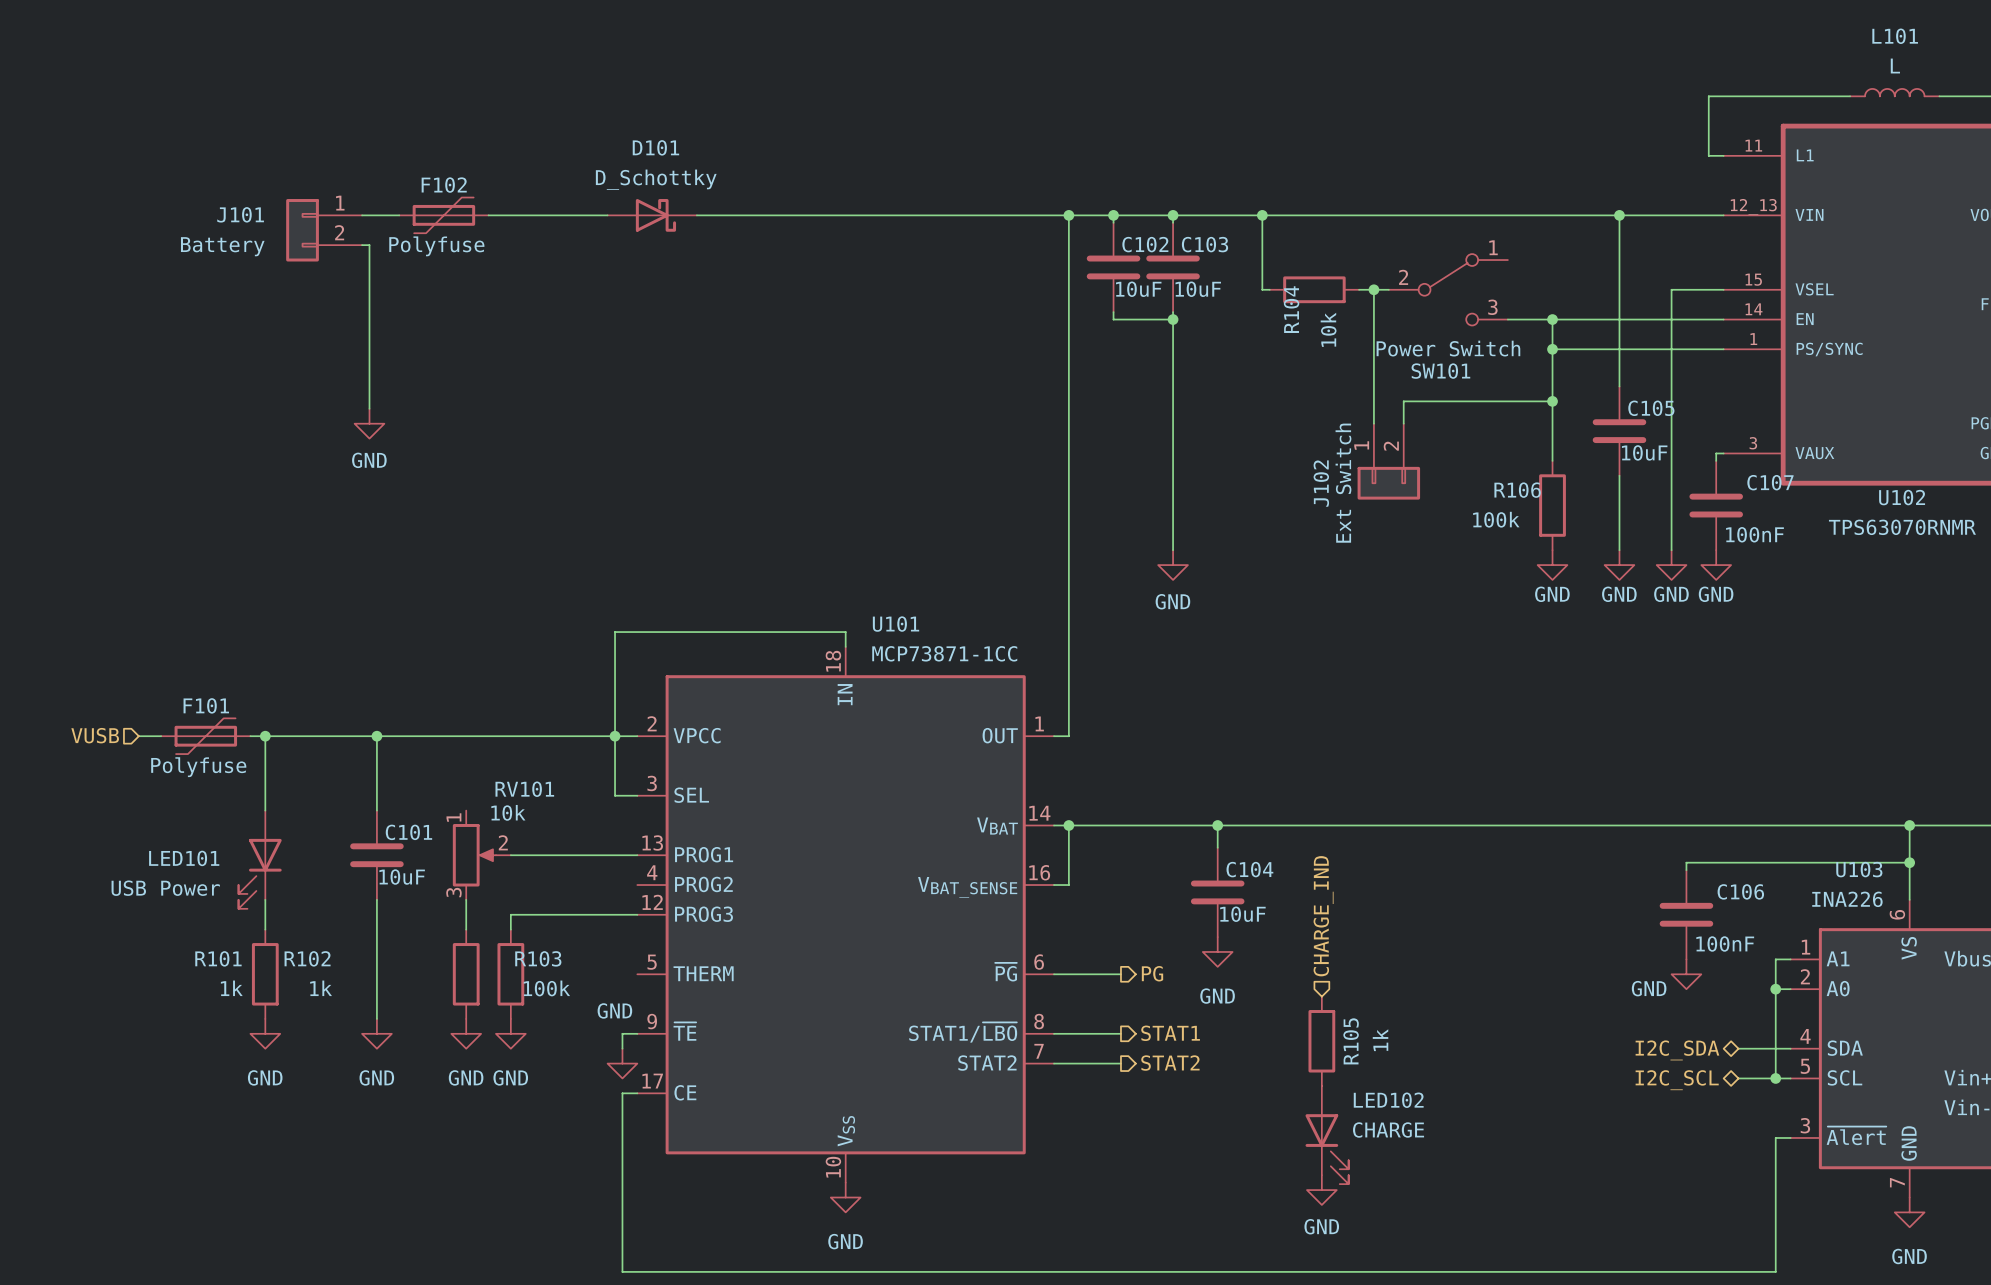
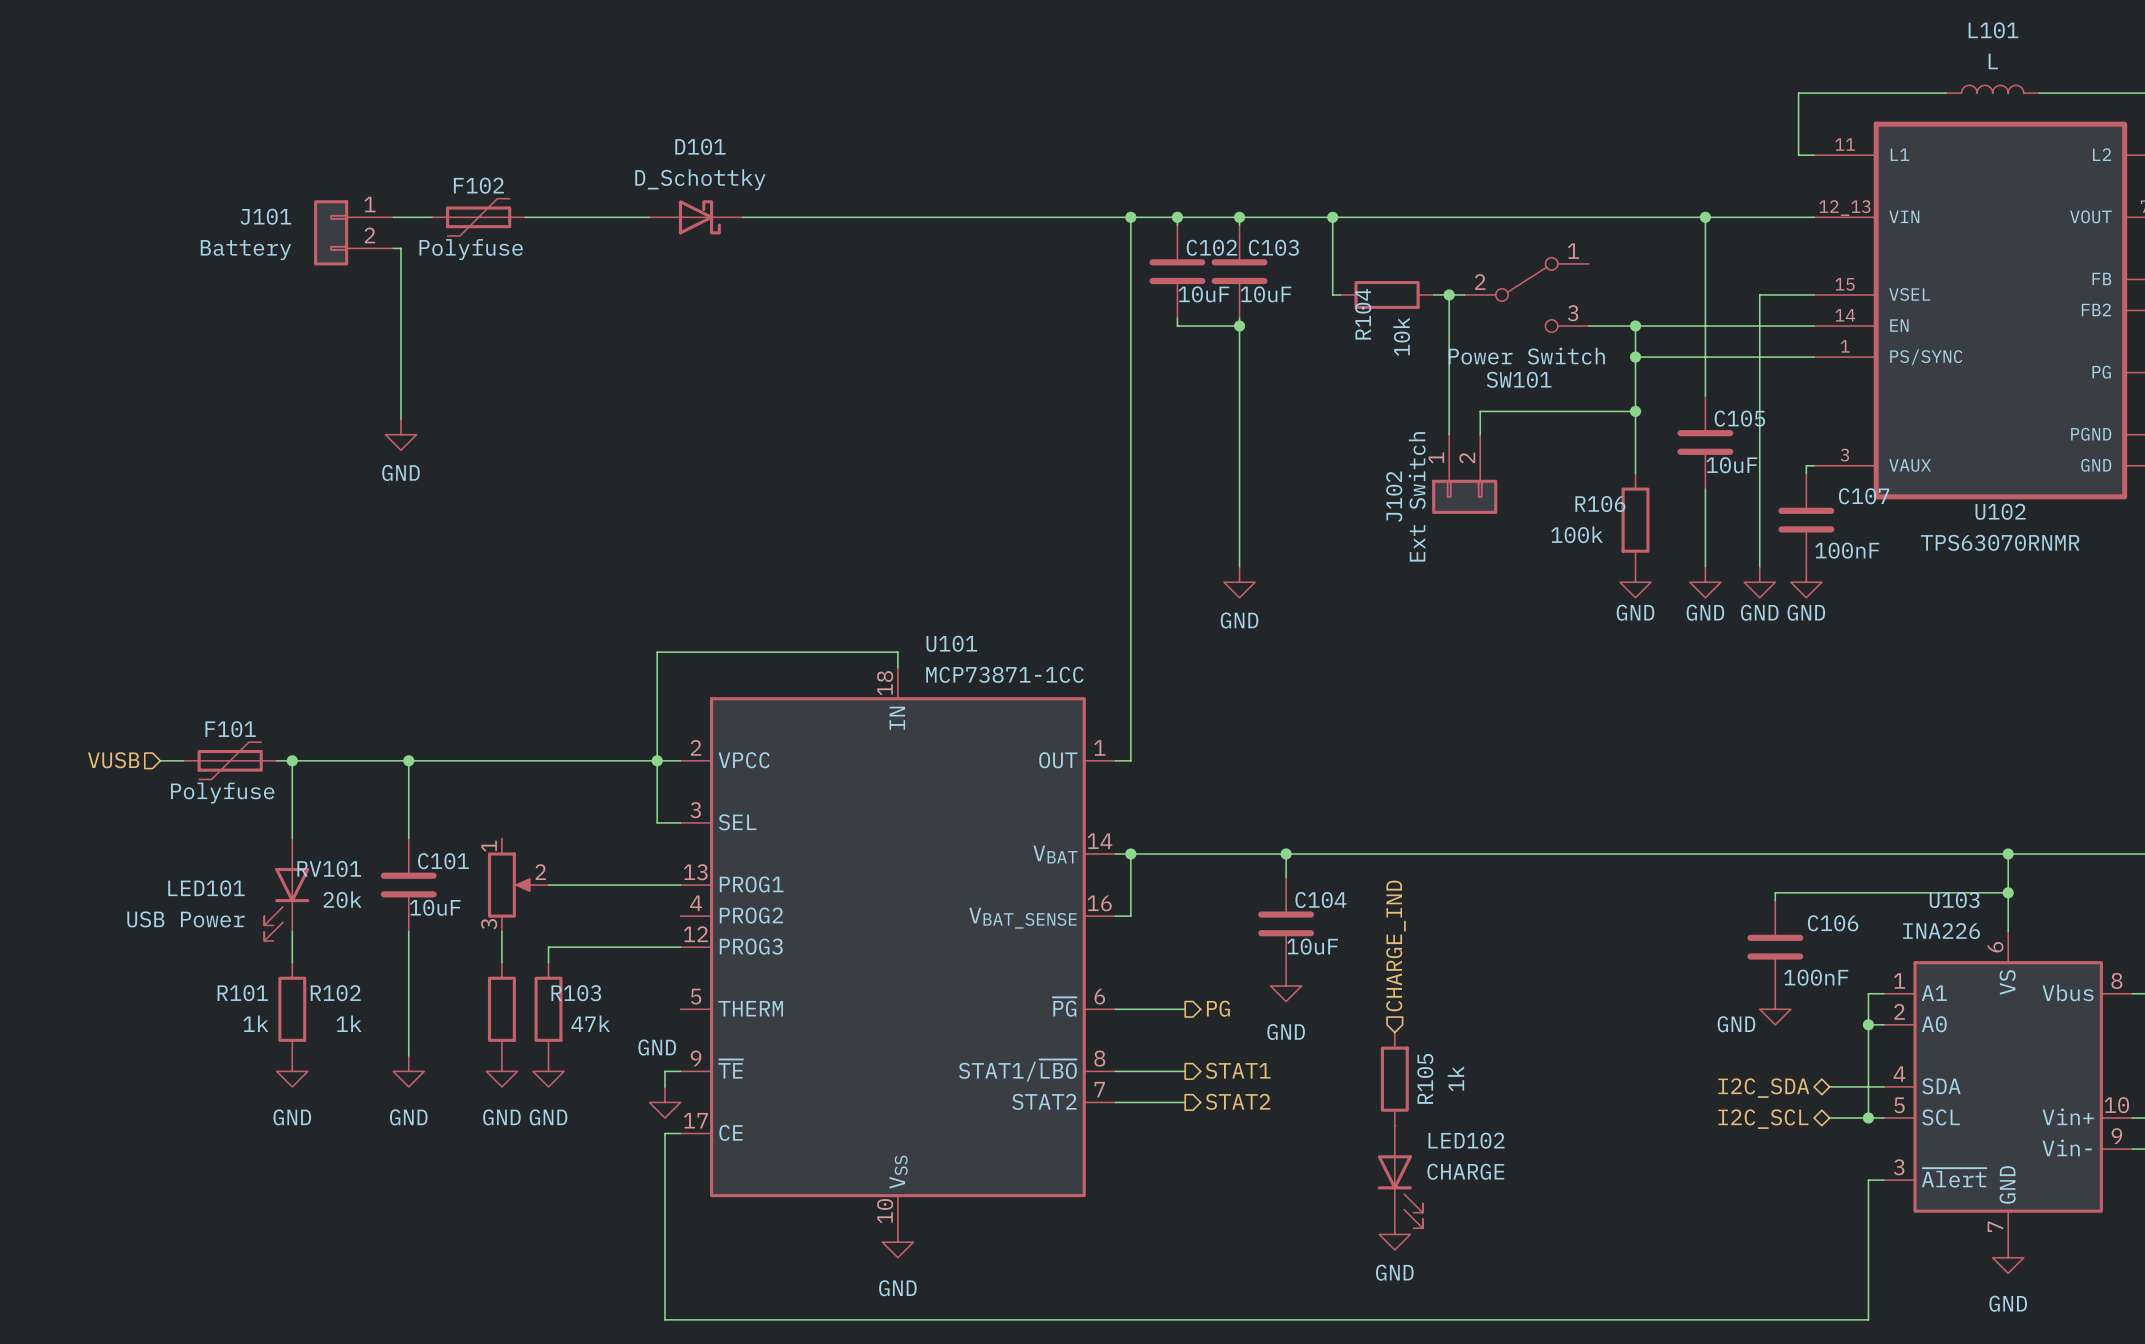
RV101 name position: RV101 (524, 789) -> RV101 (329, 868)
RV101 value: 10k (508, 812) -> 20k (342, 899)
R103 value: 100k (546, 988) -> 47k (590, 1023)

